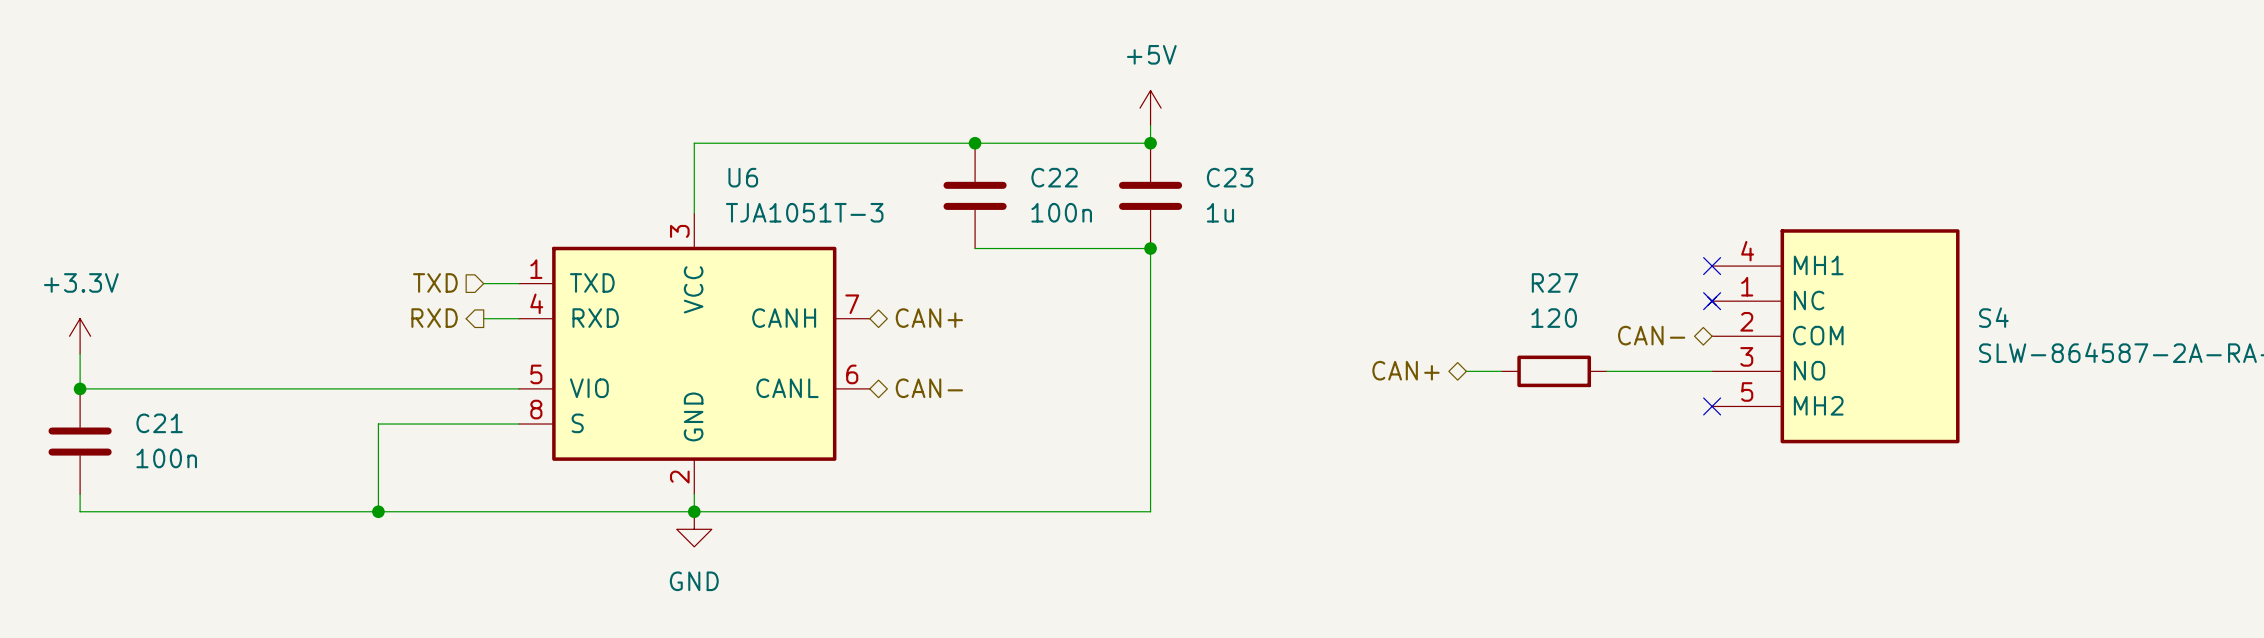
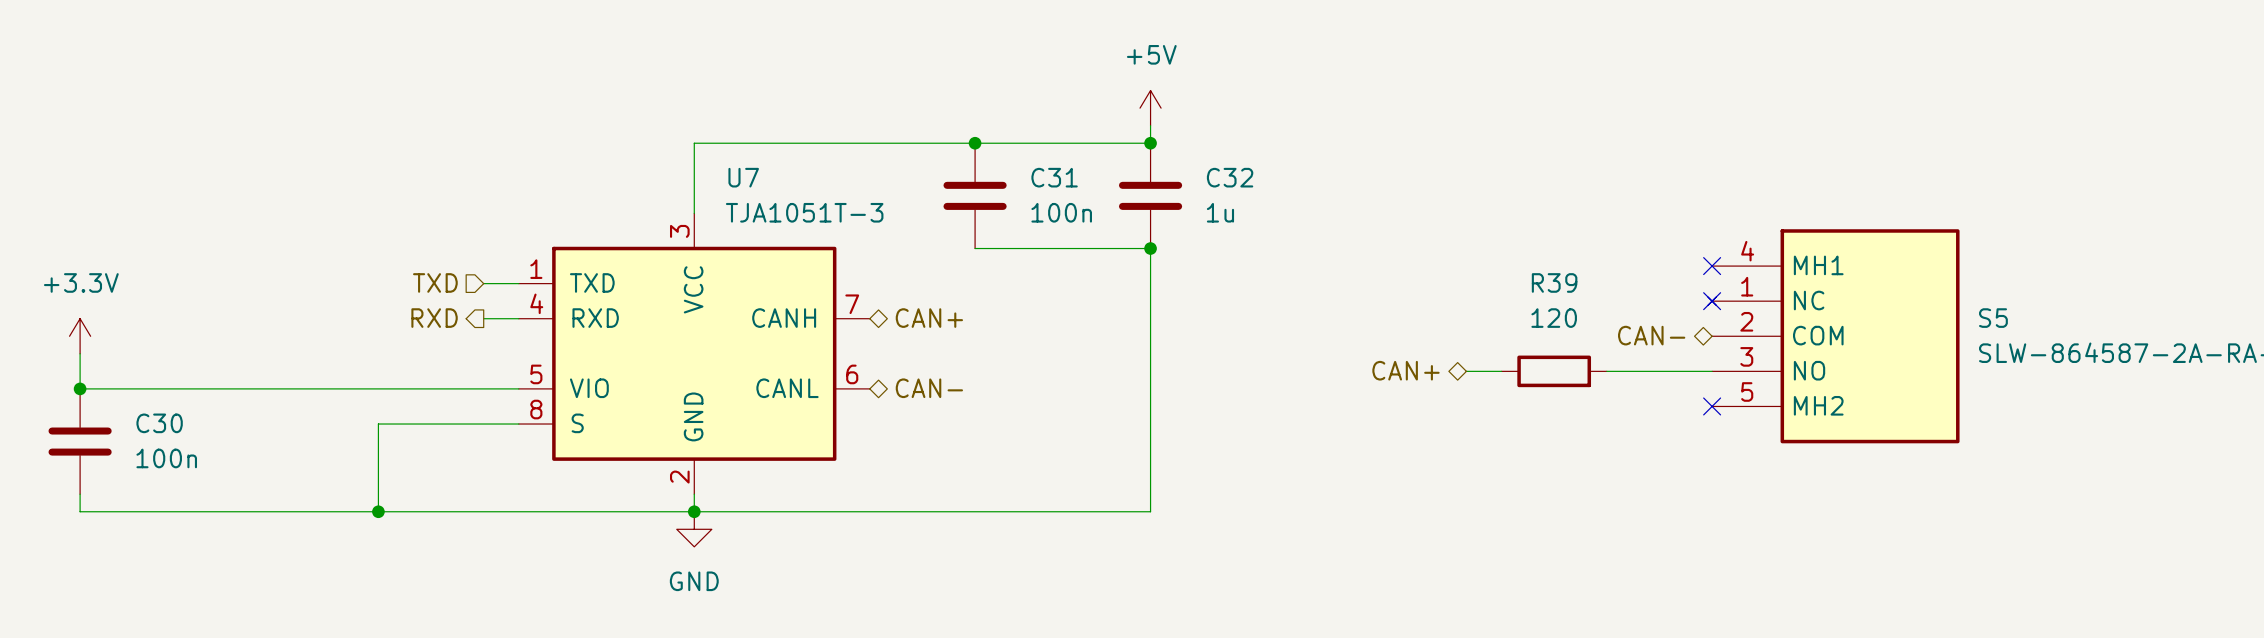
U6 name: U6 (743, 177) -> U7 (743, 177)
C22 name: C22 (1054, 177) -> C31 (1054, 177)
C23 name: C23 (1230, 177) -> C32 (1230, 177)
R27 name: R27 (1555, 282) -> R39 (1554, 282)
S4 name: S4 (1993, 317) -> S5 (1993, 318)
C21 name: C21 (159, 423) -> C30 (159, 423)

